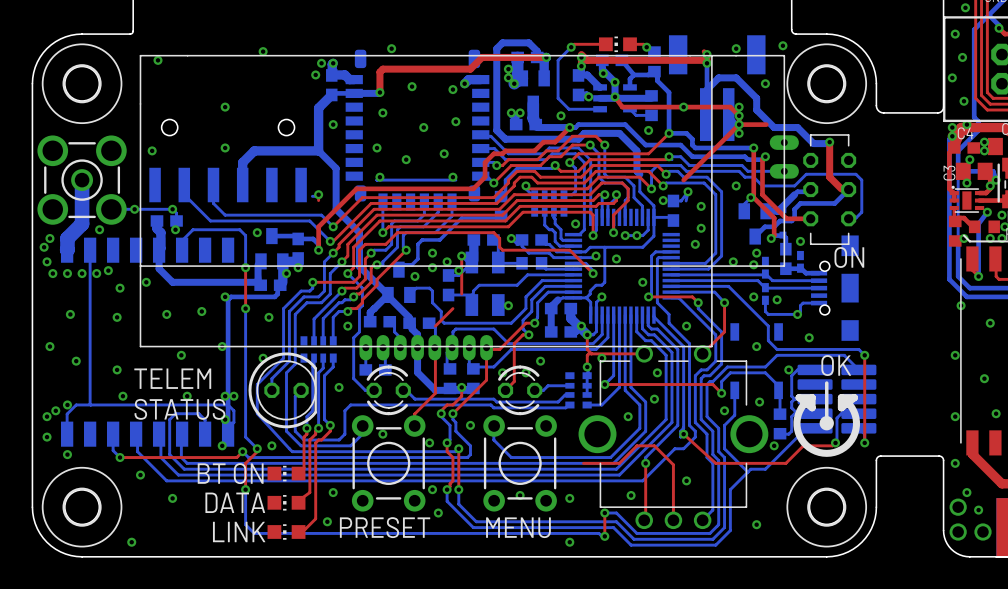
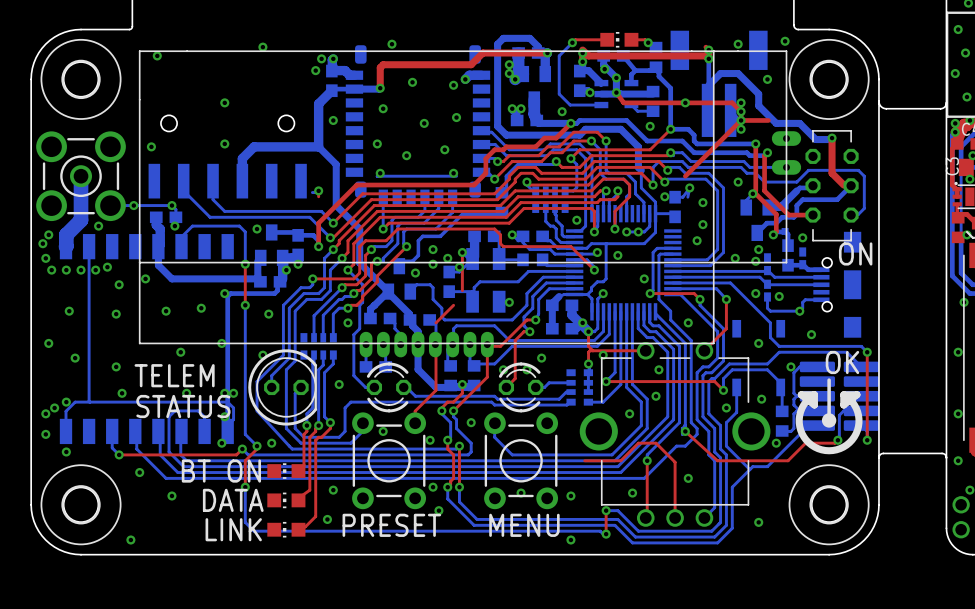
board edge: none -> (878, 101) (878, 457)
board edge: none -> (946, 102) (946, 457)

